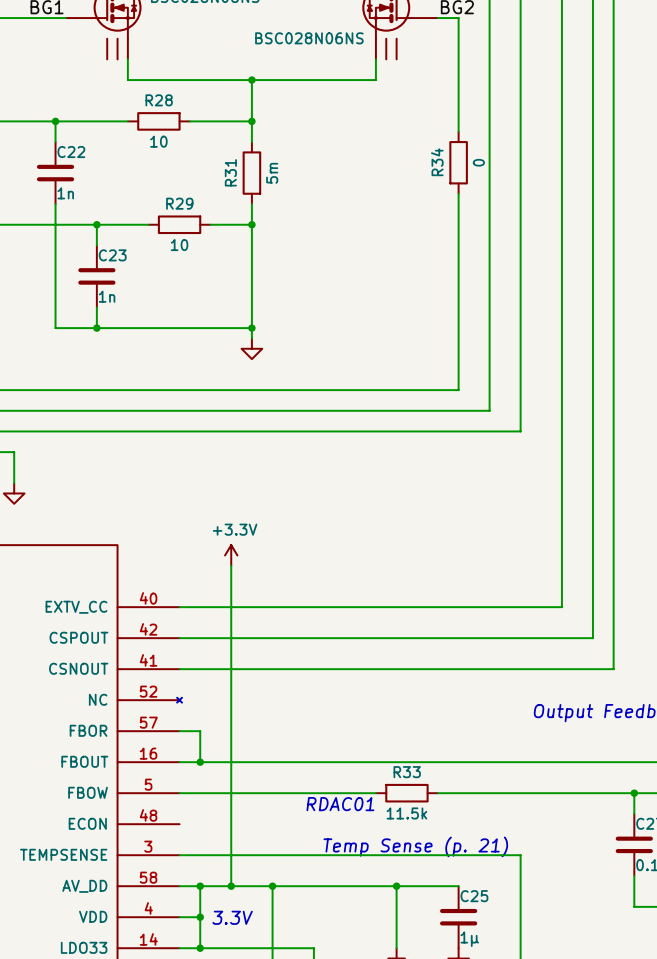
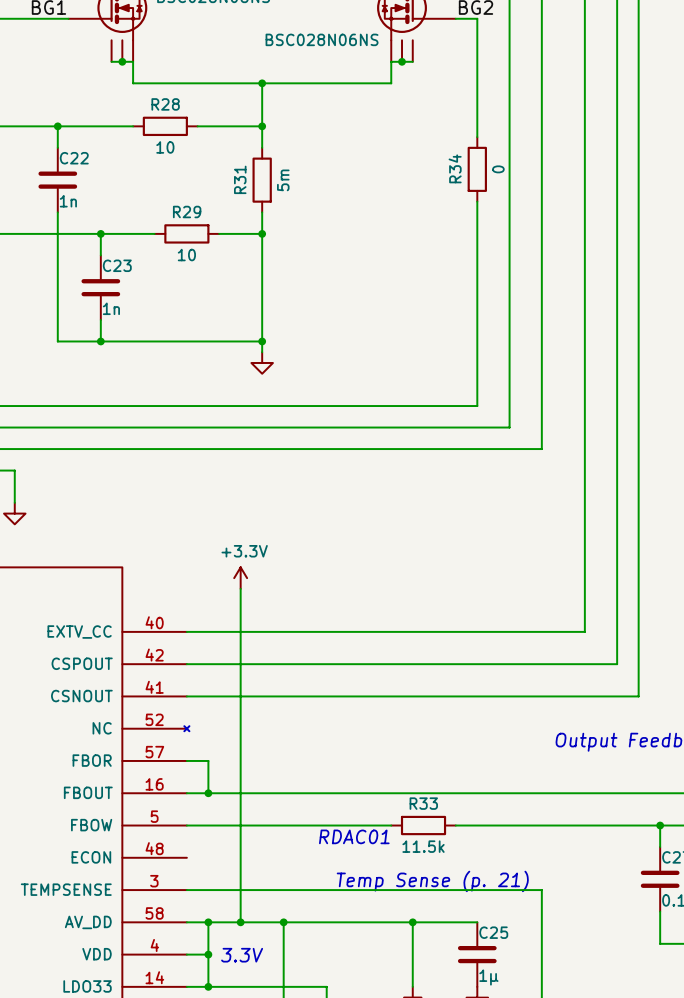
wire: none -> (111, 61) (133, 61)
junction: none -> (122, 61)
wire: none -> (391, 61) (412, 61)
junction: none -> (402, 61)

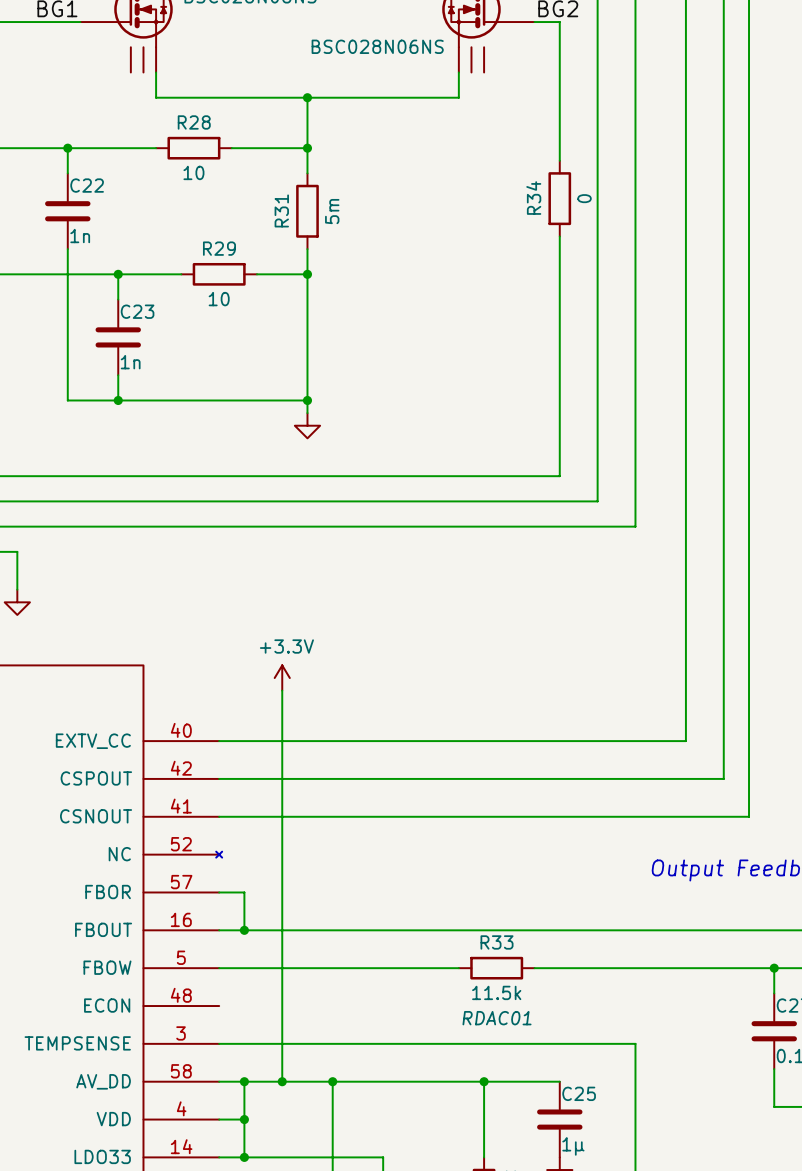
wire: (111, 61) (133, 61) -> none
junction: (122, 61) -> none
wire: (391, 61) (412, 61) -> none
junction: (402, 61) -> none
text: RDAC01 (354, 836) -> none
R33 text: none -> RDAC01 (497, 1018)
text: Temp Sense (p. 21) (432, 881) -> none
text: 3.3V (242, 955) -> none

